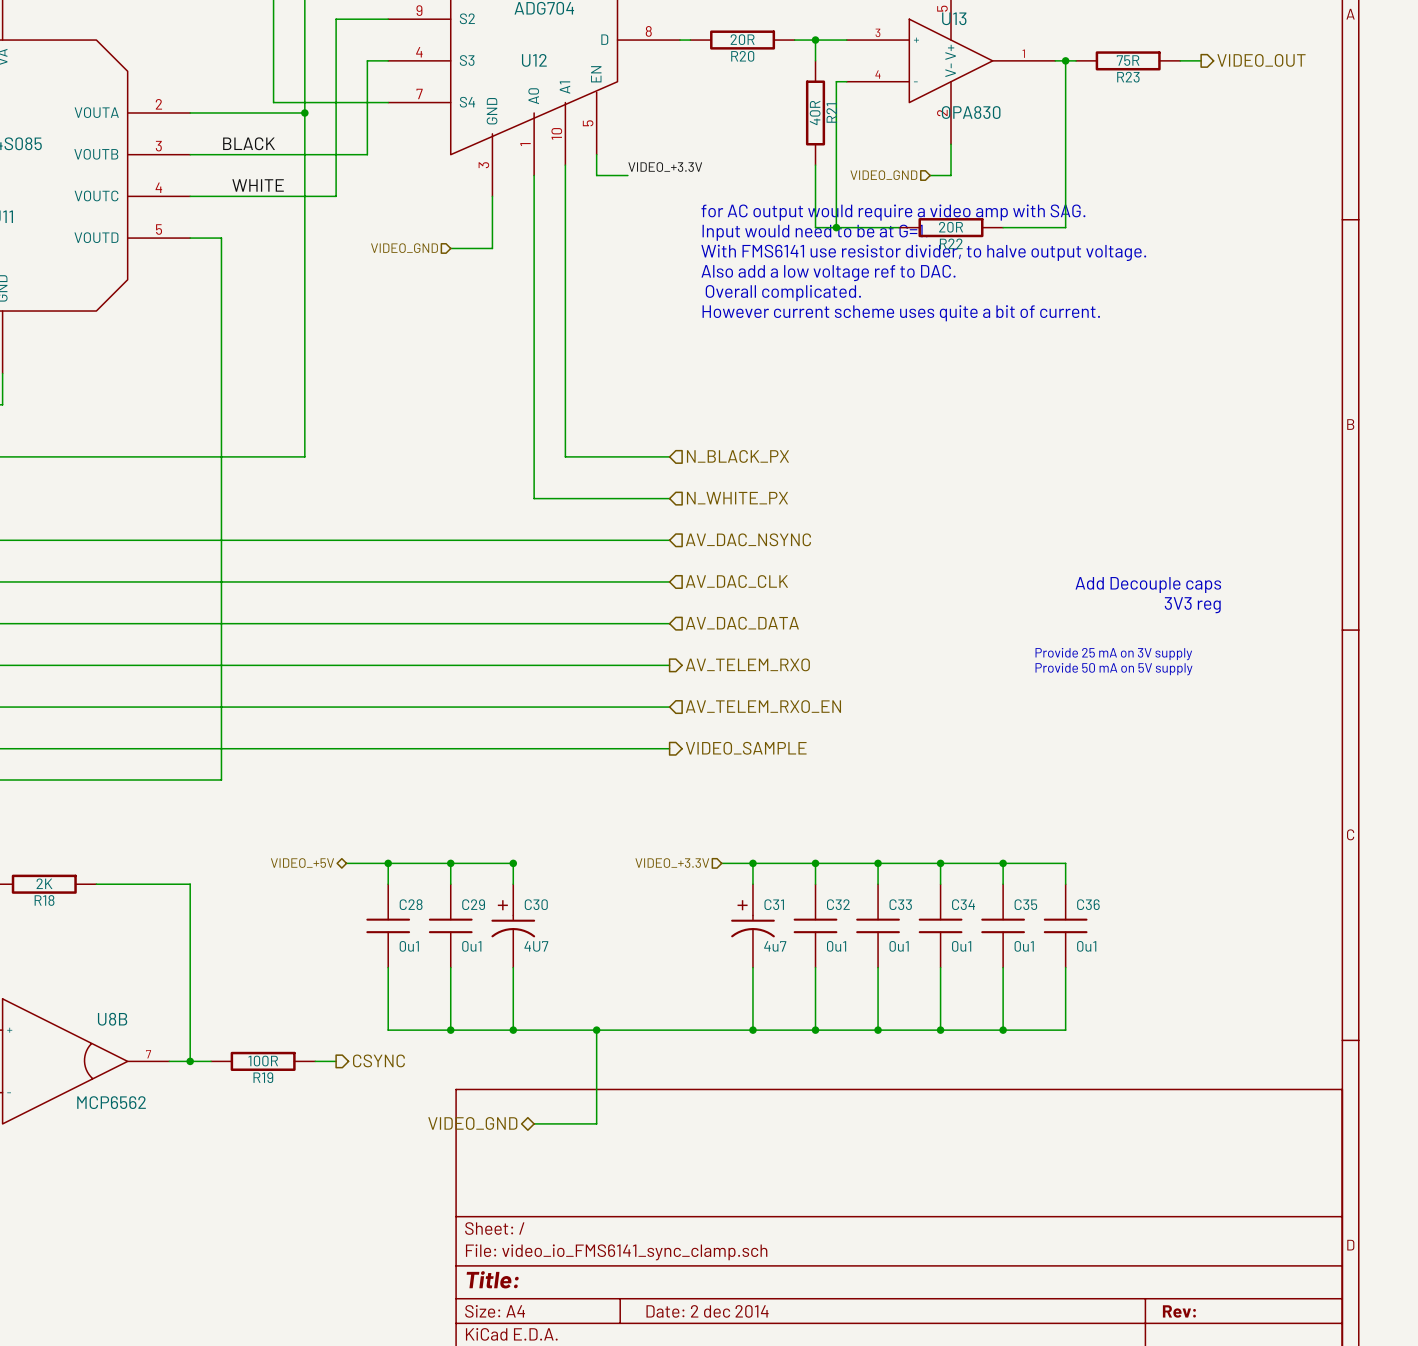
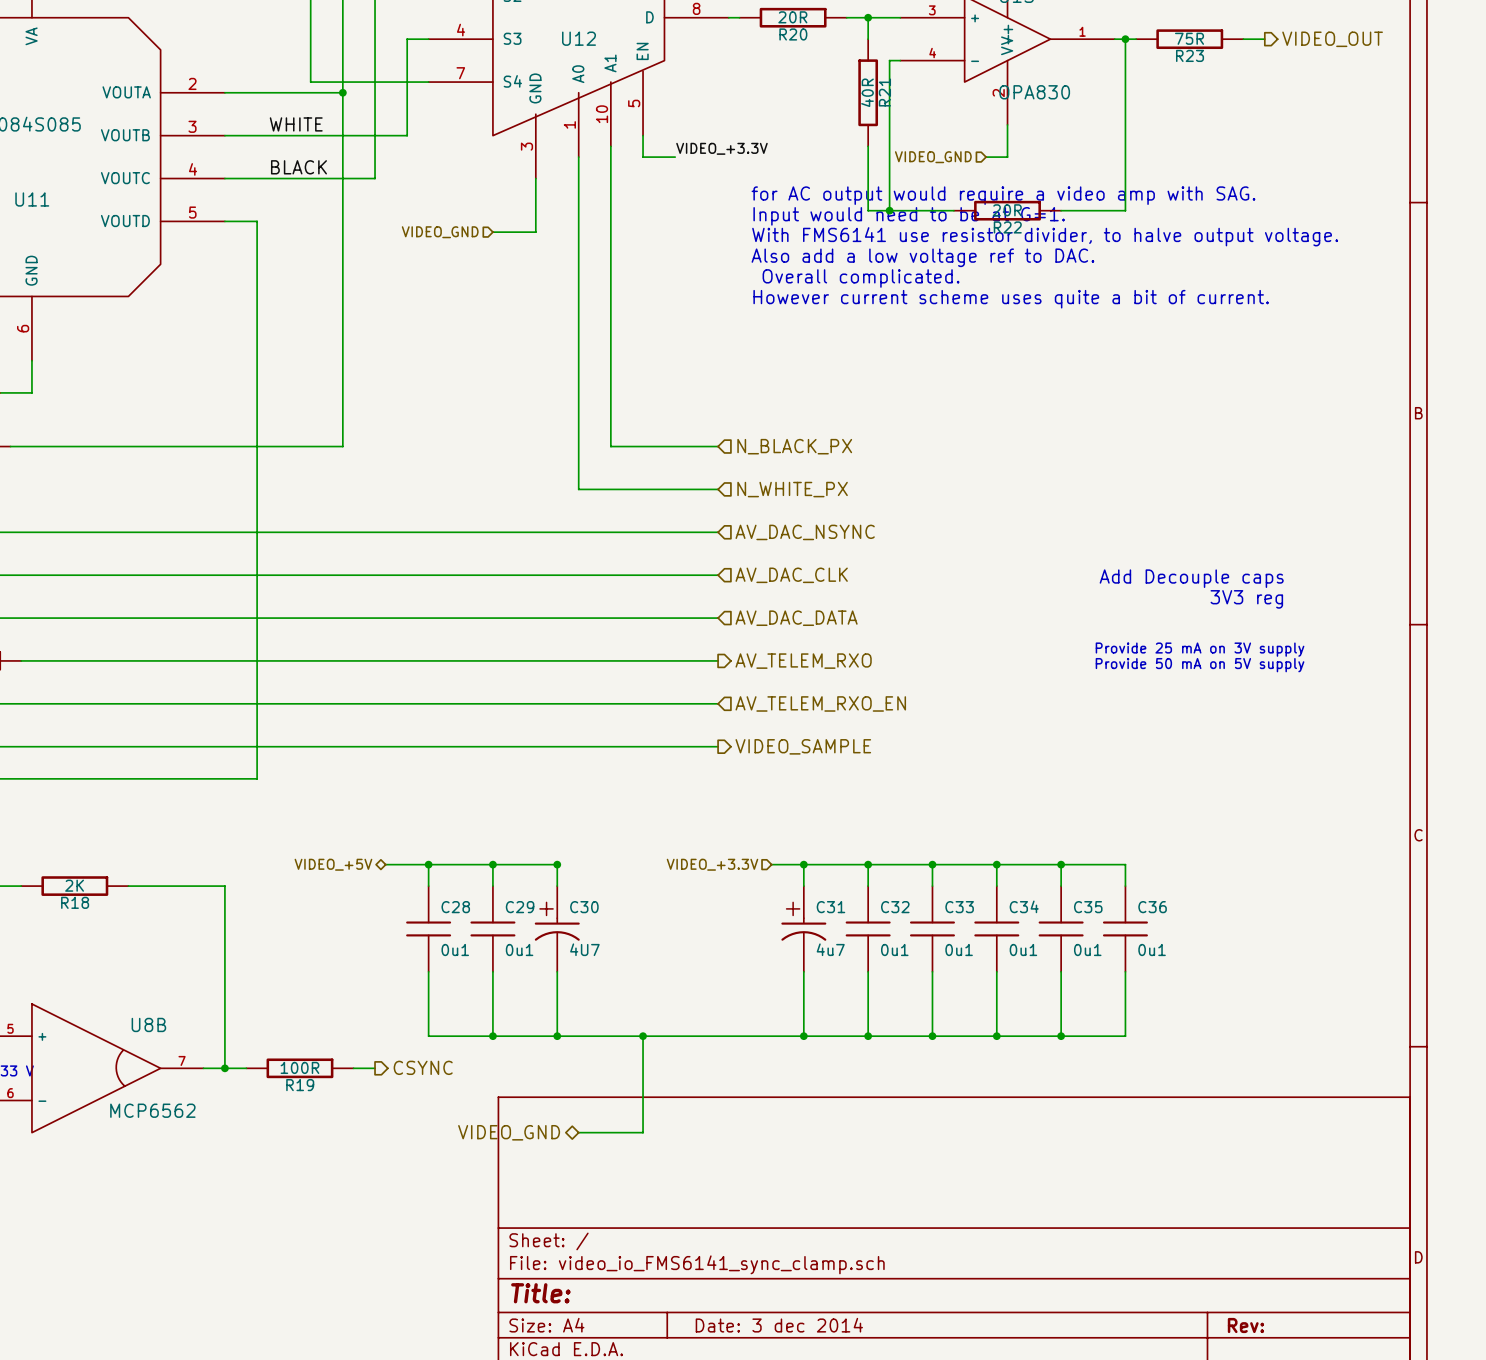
label: BLACK (249, 143) -> none
label: none -> WHITE (296, 124)
label: WHITE (258, 185) -> BLACK (298, 167)
title block: Date: 2 dec 2014 (707, 1311) -> Date: 3 dec 2014 (779, 1325)

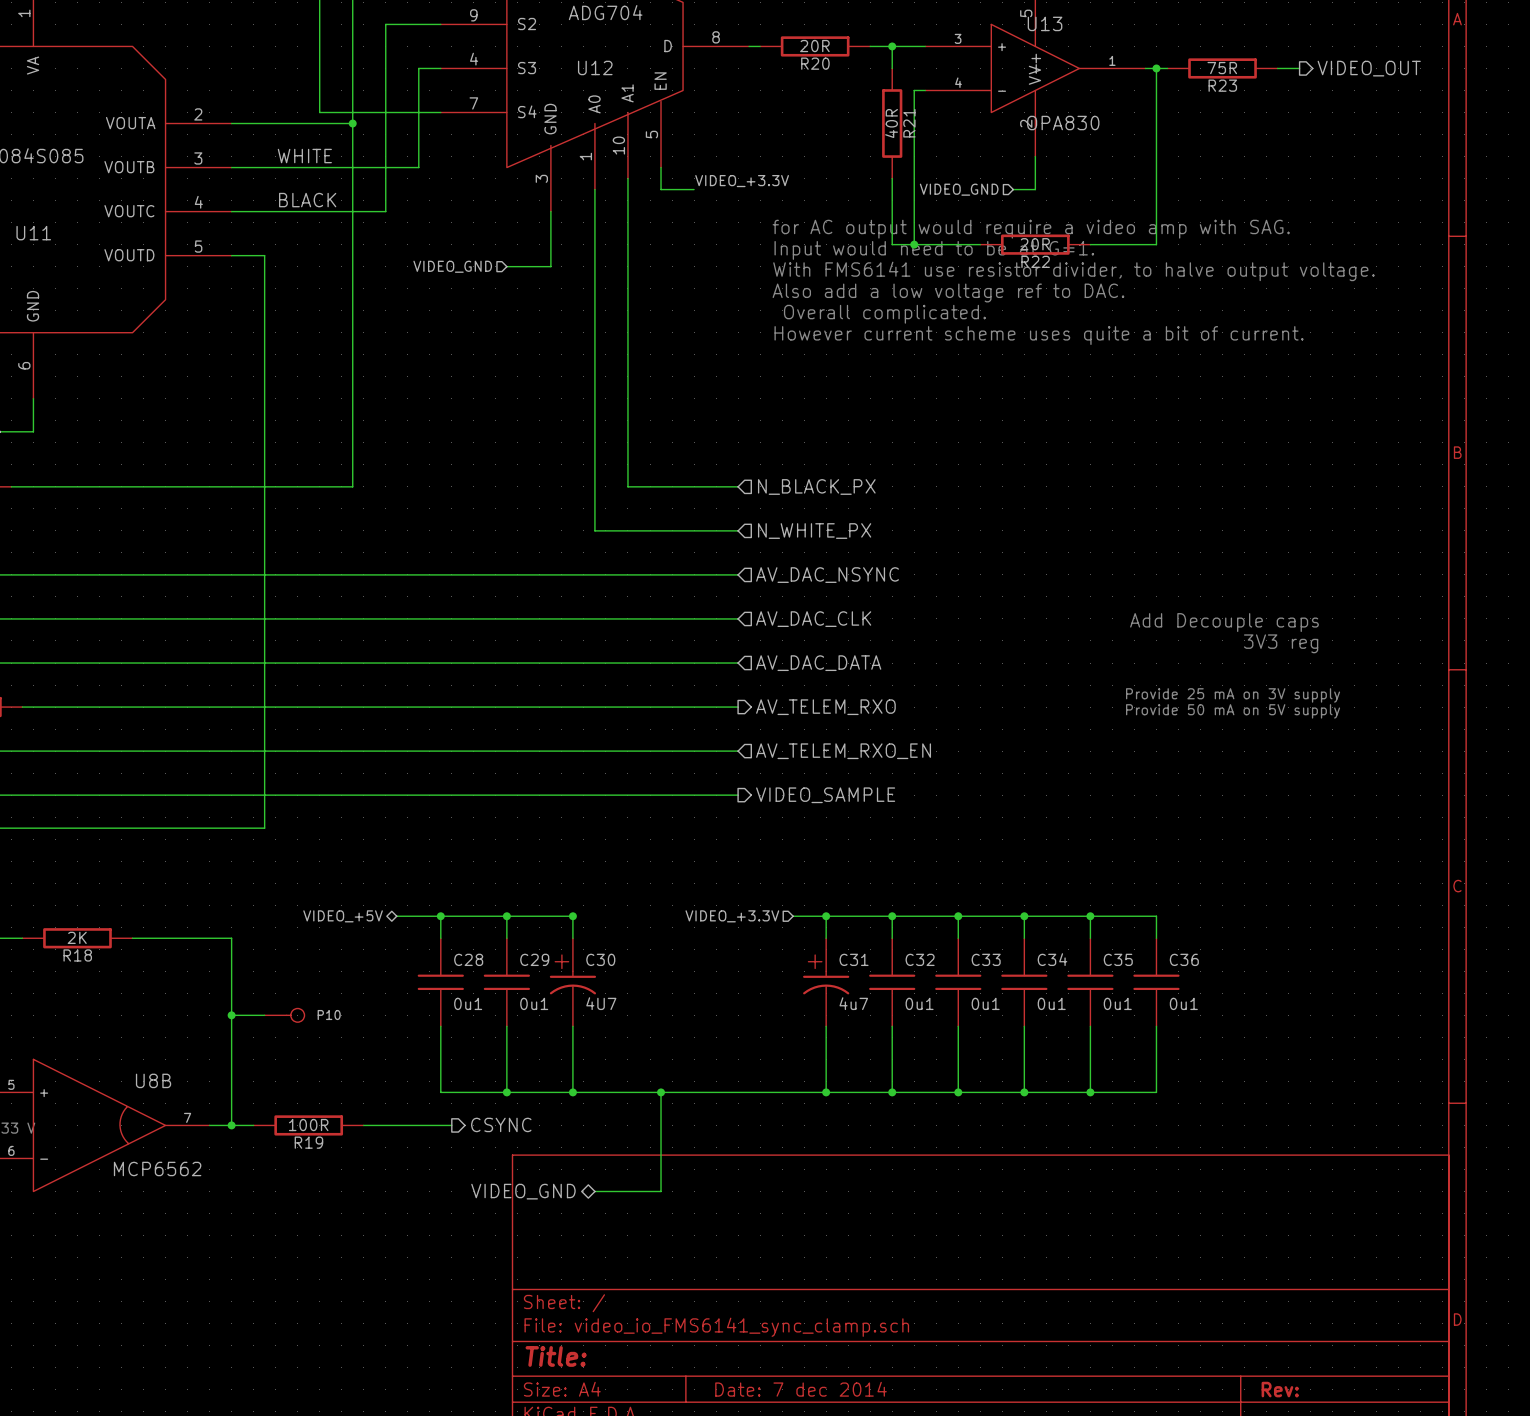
wire: none -> (231, 1015) (264, 1015)
junction: none -> (231, 1015)
P10: none -> (284, 1015)
hierarchical label position: CSYNC (423, 1067) -> CSYNC (501, 1124)
wire: none -> (385, 1125) (451, 1125)
title block: Date: 3 dec 2014 (779, 1325) -> Date: 7 dec 2014 (801, 1389)

